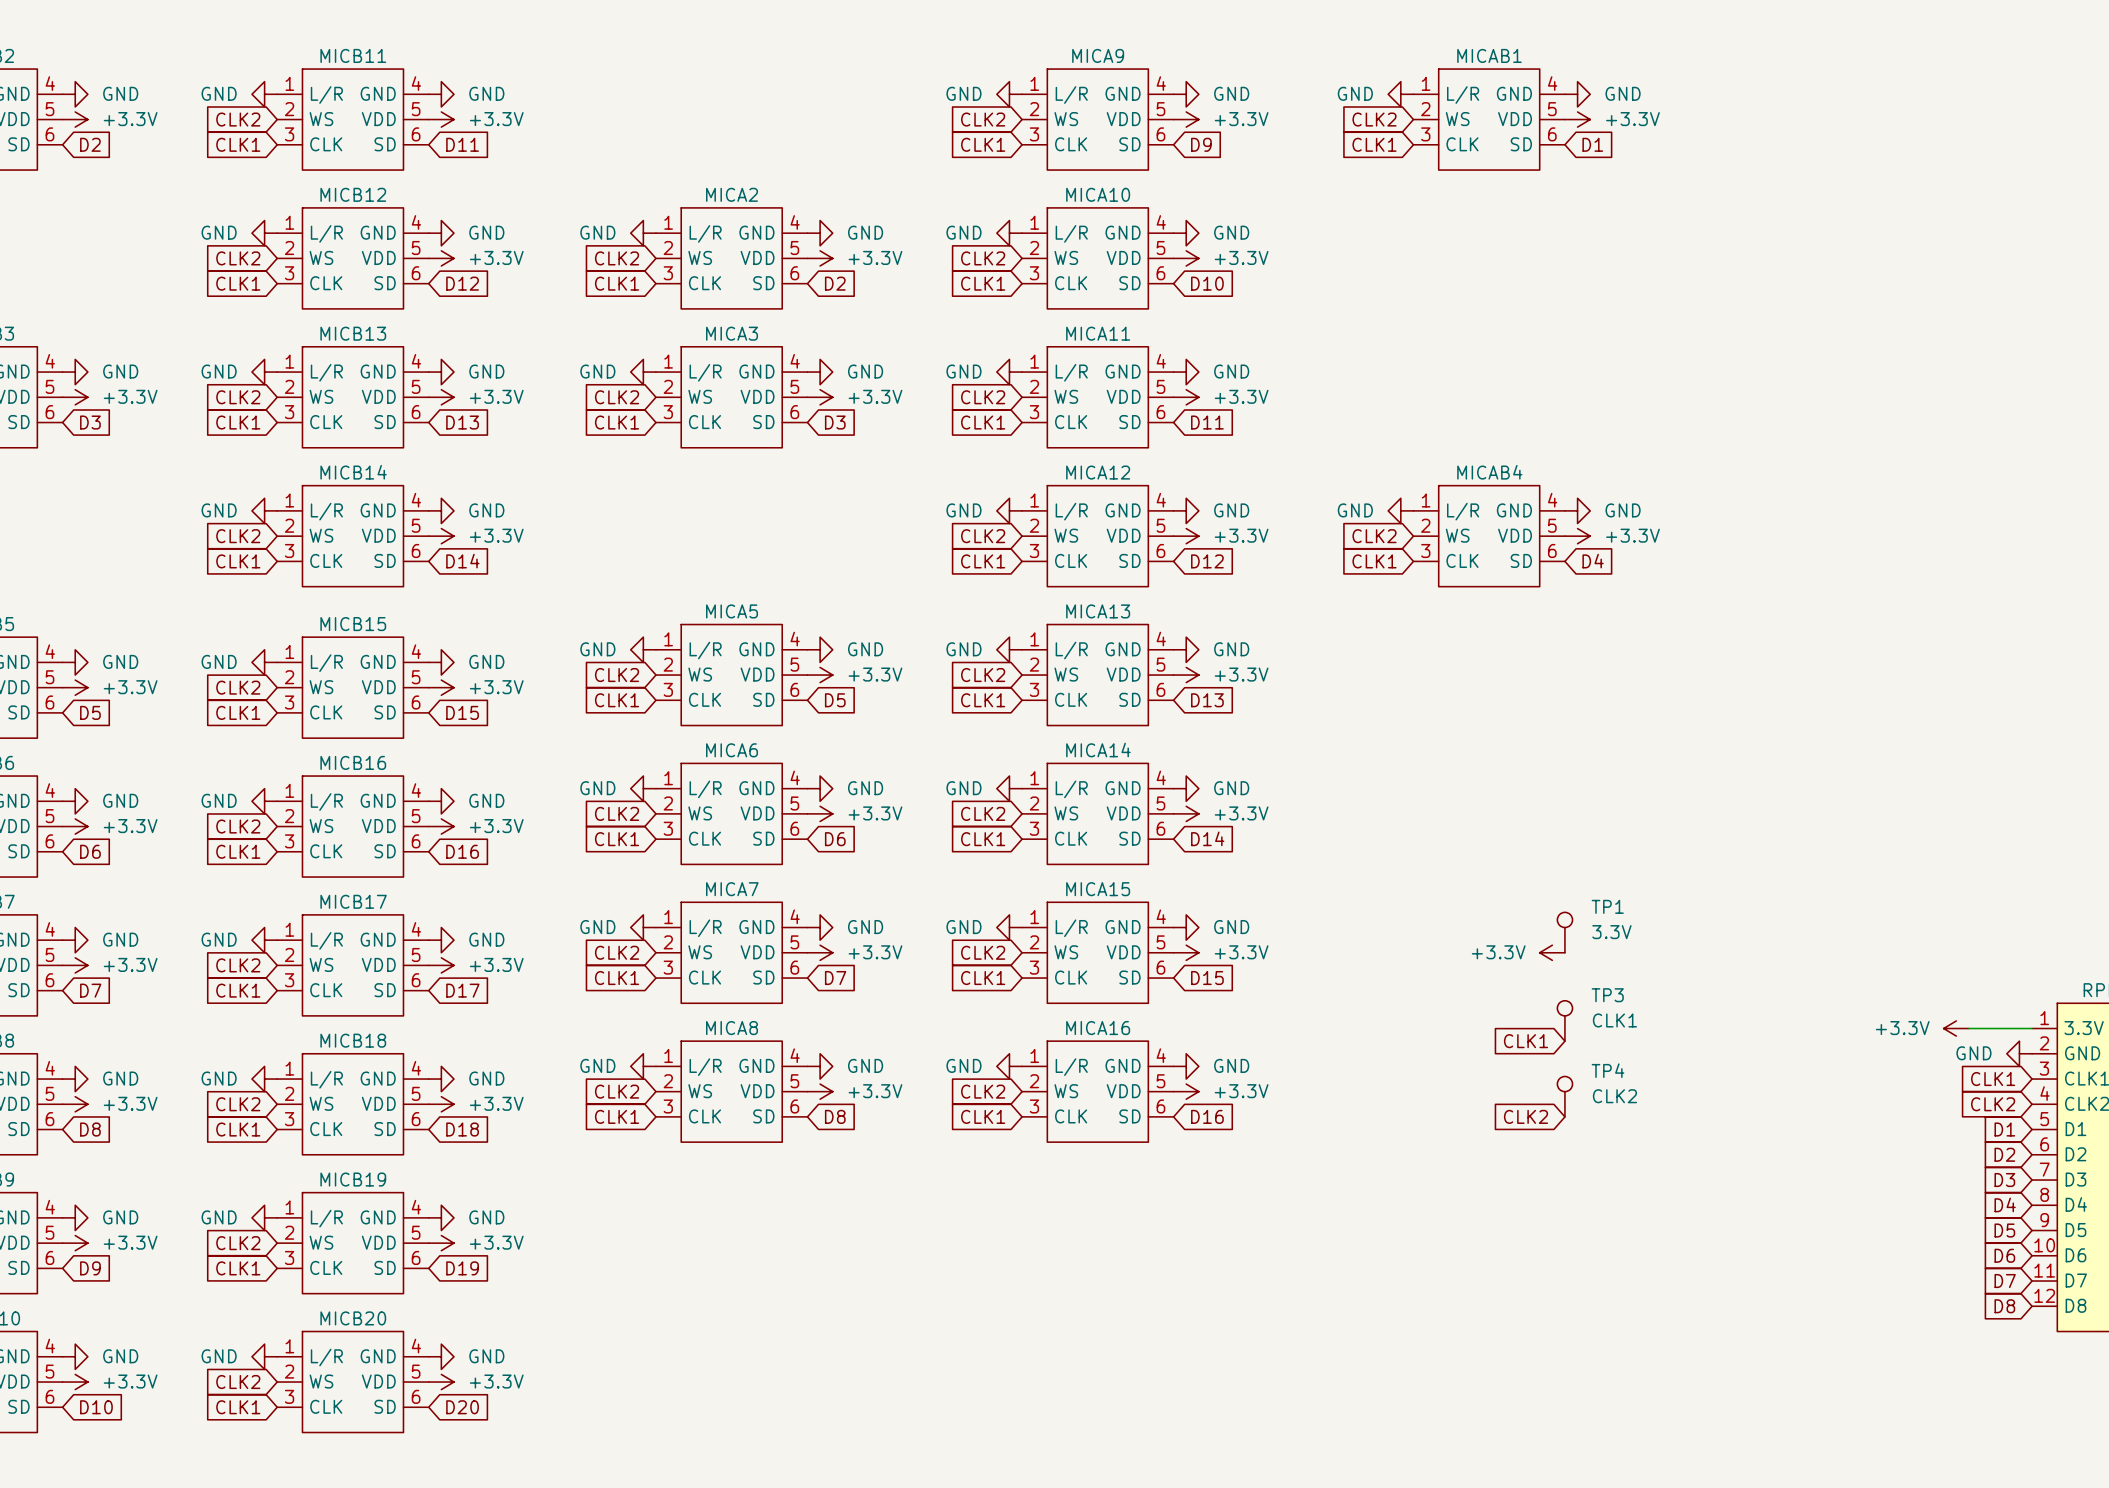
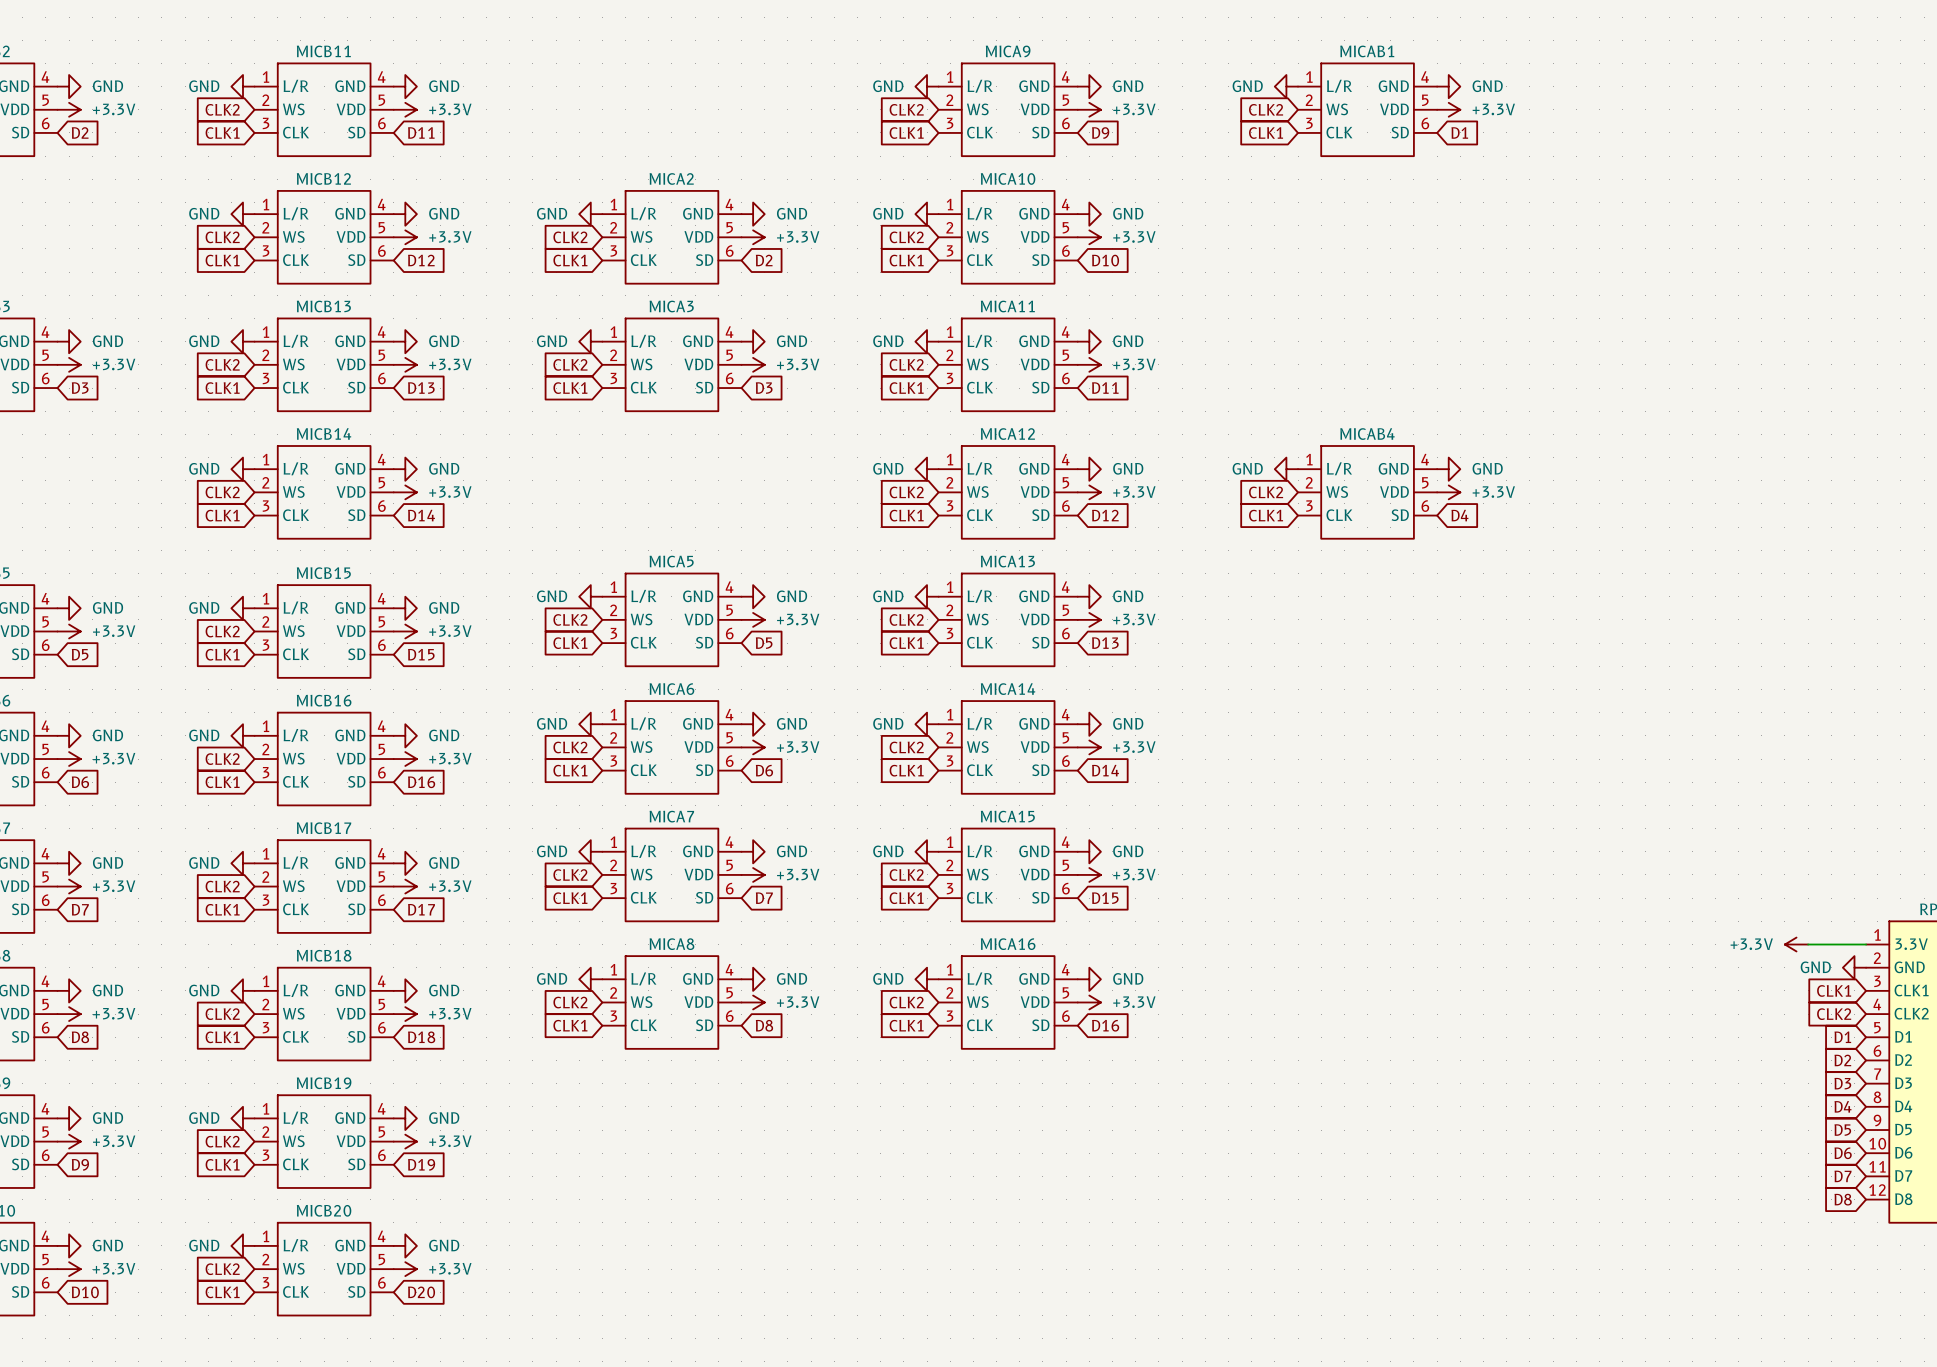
TP1: 3.3V (1564, 932) -> none
power symbol: +3.3V (1552, 952) -> none
TP3: CLK1 (1564, 1020) -> none
global label: CLK1 (1526, 1041) -> none
TP4: CLK2 (1564, 1096) -> none
global label: CLK2 (1526, 1116) -> none

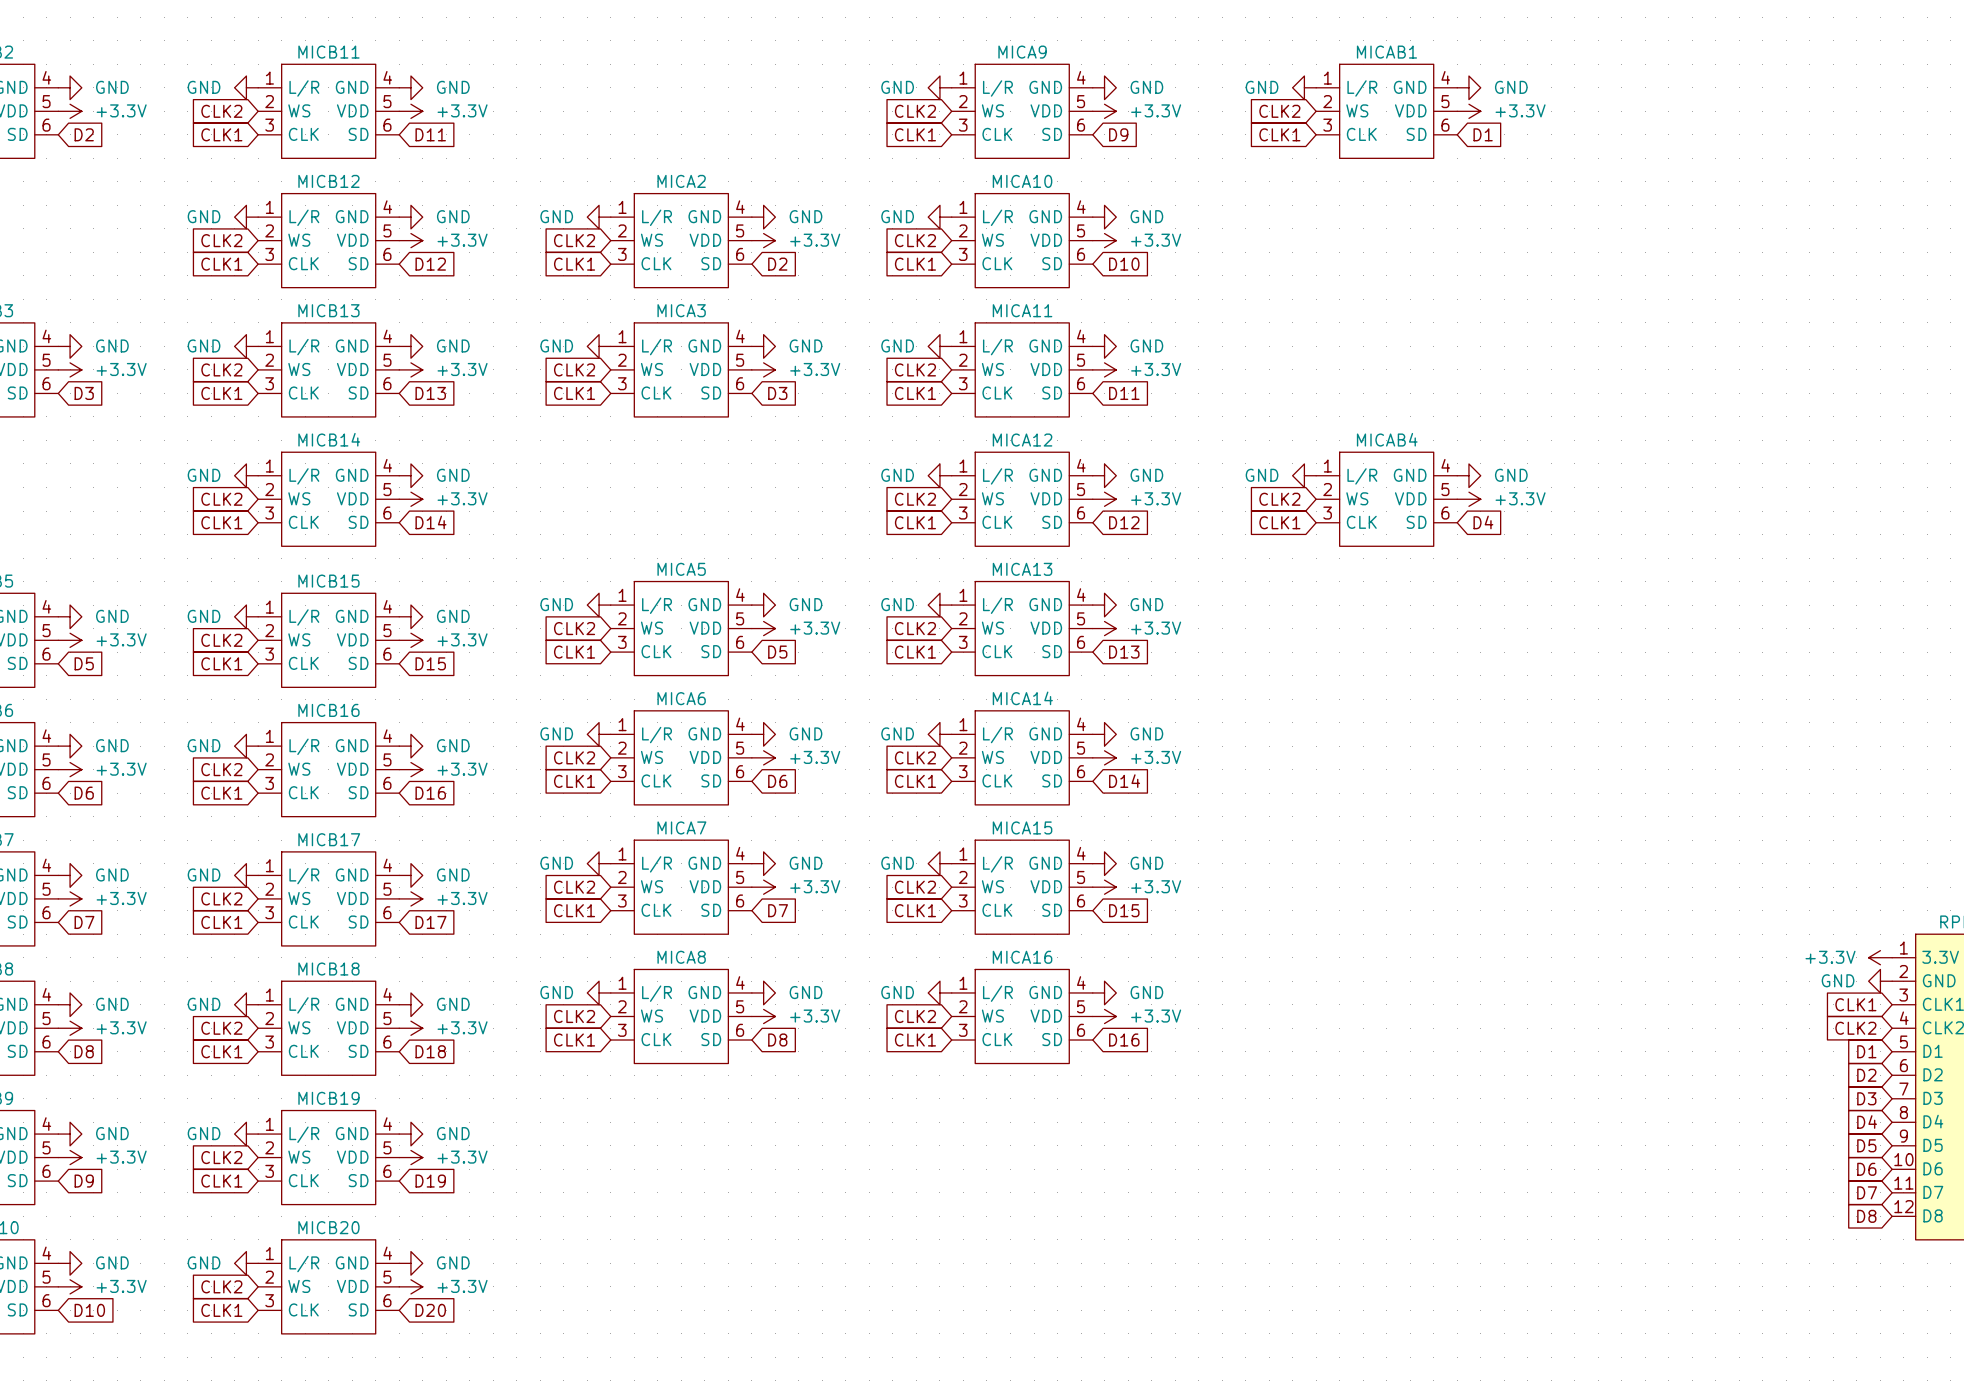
power symbol position: +3.3V (1796, 944) -> +3.3V (1880, 957)
wire: (1808, 944) (1866, 944) -> none

